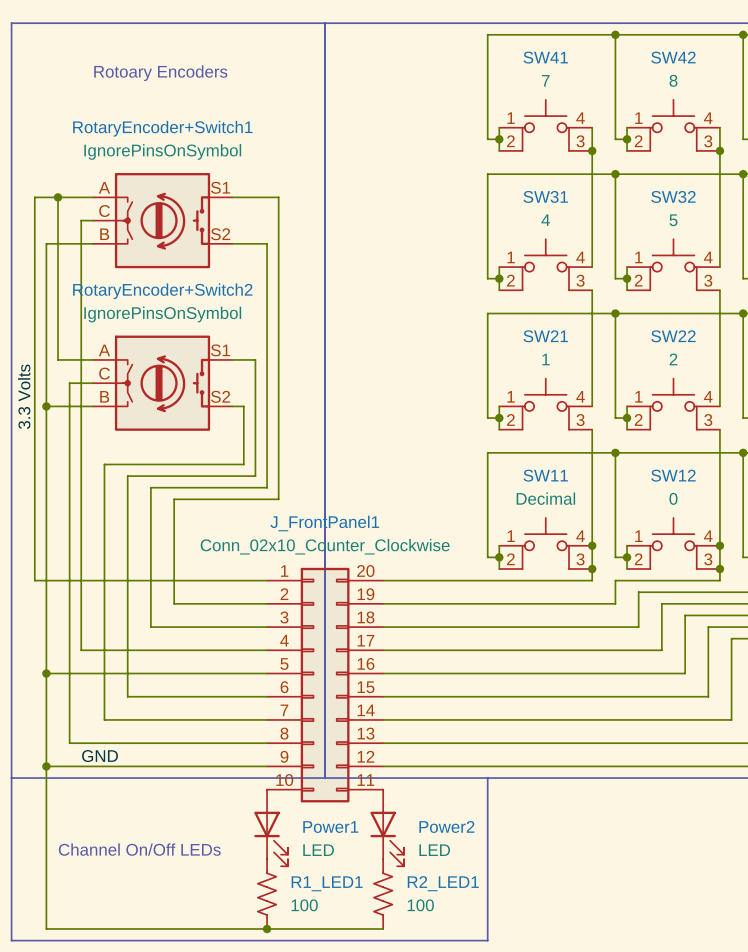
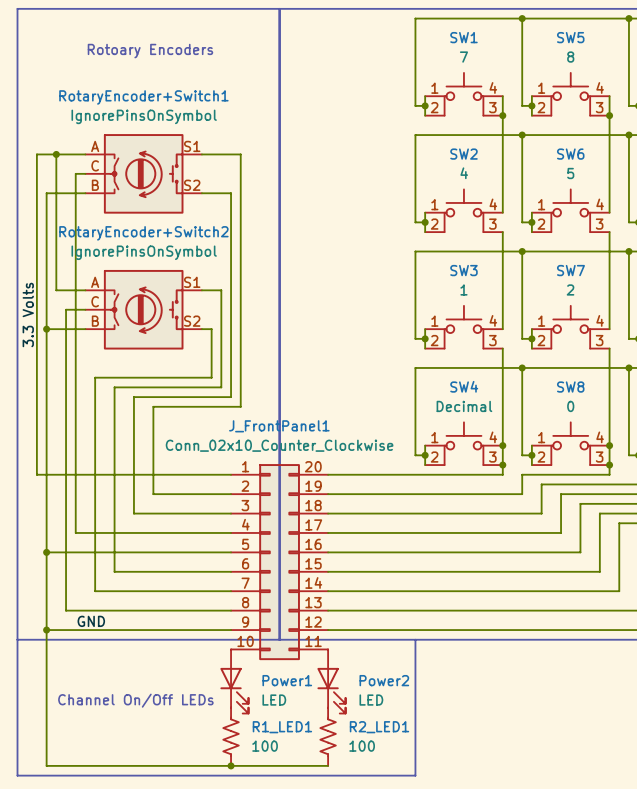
SW41 name: SW41 (545, 57) -> SW1 (463, 37)
SW42 name: SW42 (673, 57) -> SW5 (570, 37)
SW31 name: SW31 (545, 196) -> SW2 (463, 154)
SW32 name: SW32 (673, 196) -> SW6 (570, 154)
SW21 name: SW21 (545, 336) -> SW3 (463, 270)
SW22 name: SW22 (673, 336) -> SW7 (570, 270)
SW11 name: SW11 (545, 475) -> SW4 (464, 386)
SW12 name: SW12 (673, 475) -> SW8 (570, 387)

